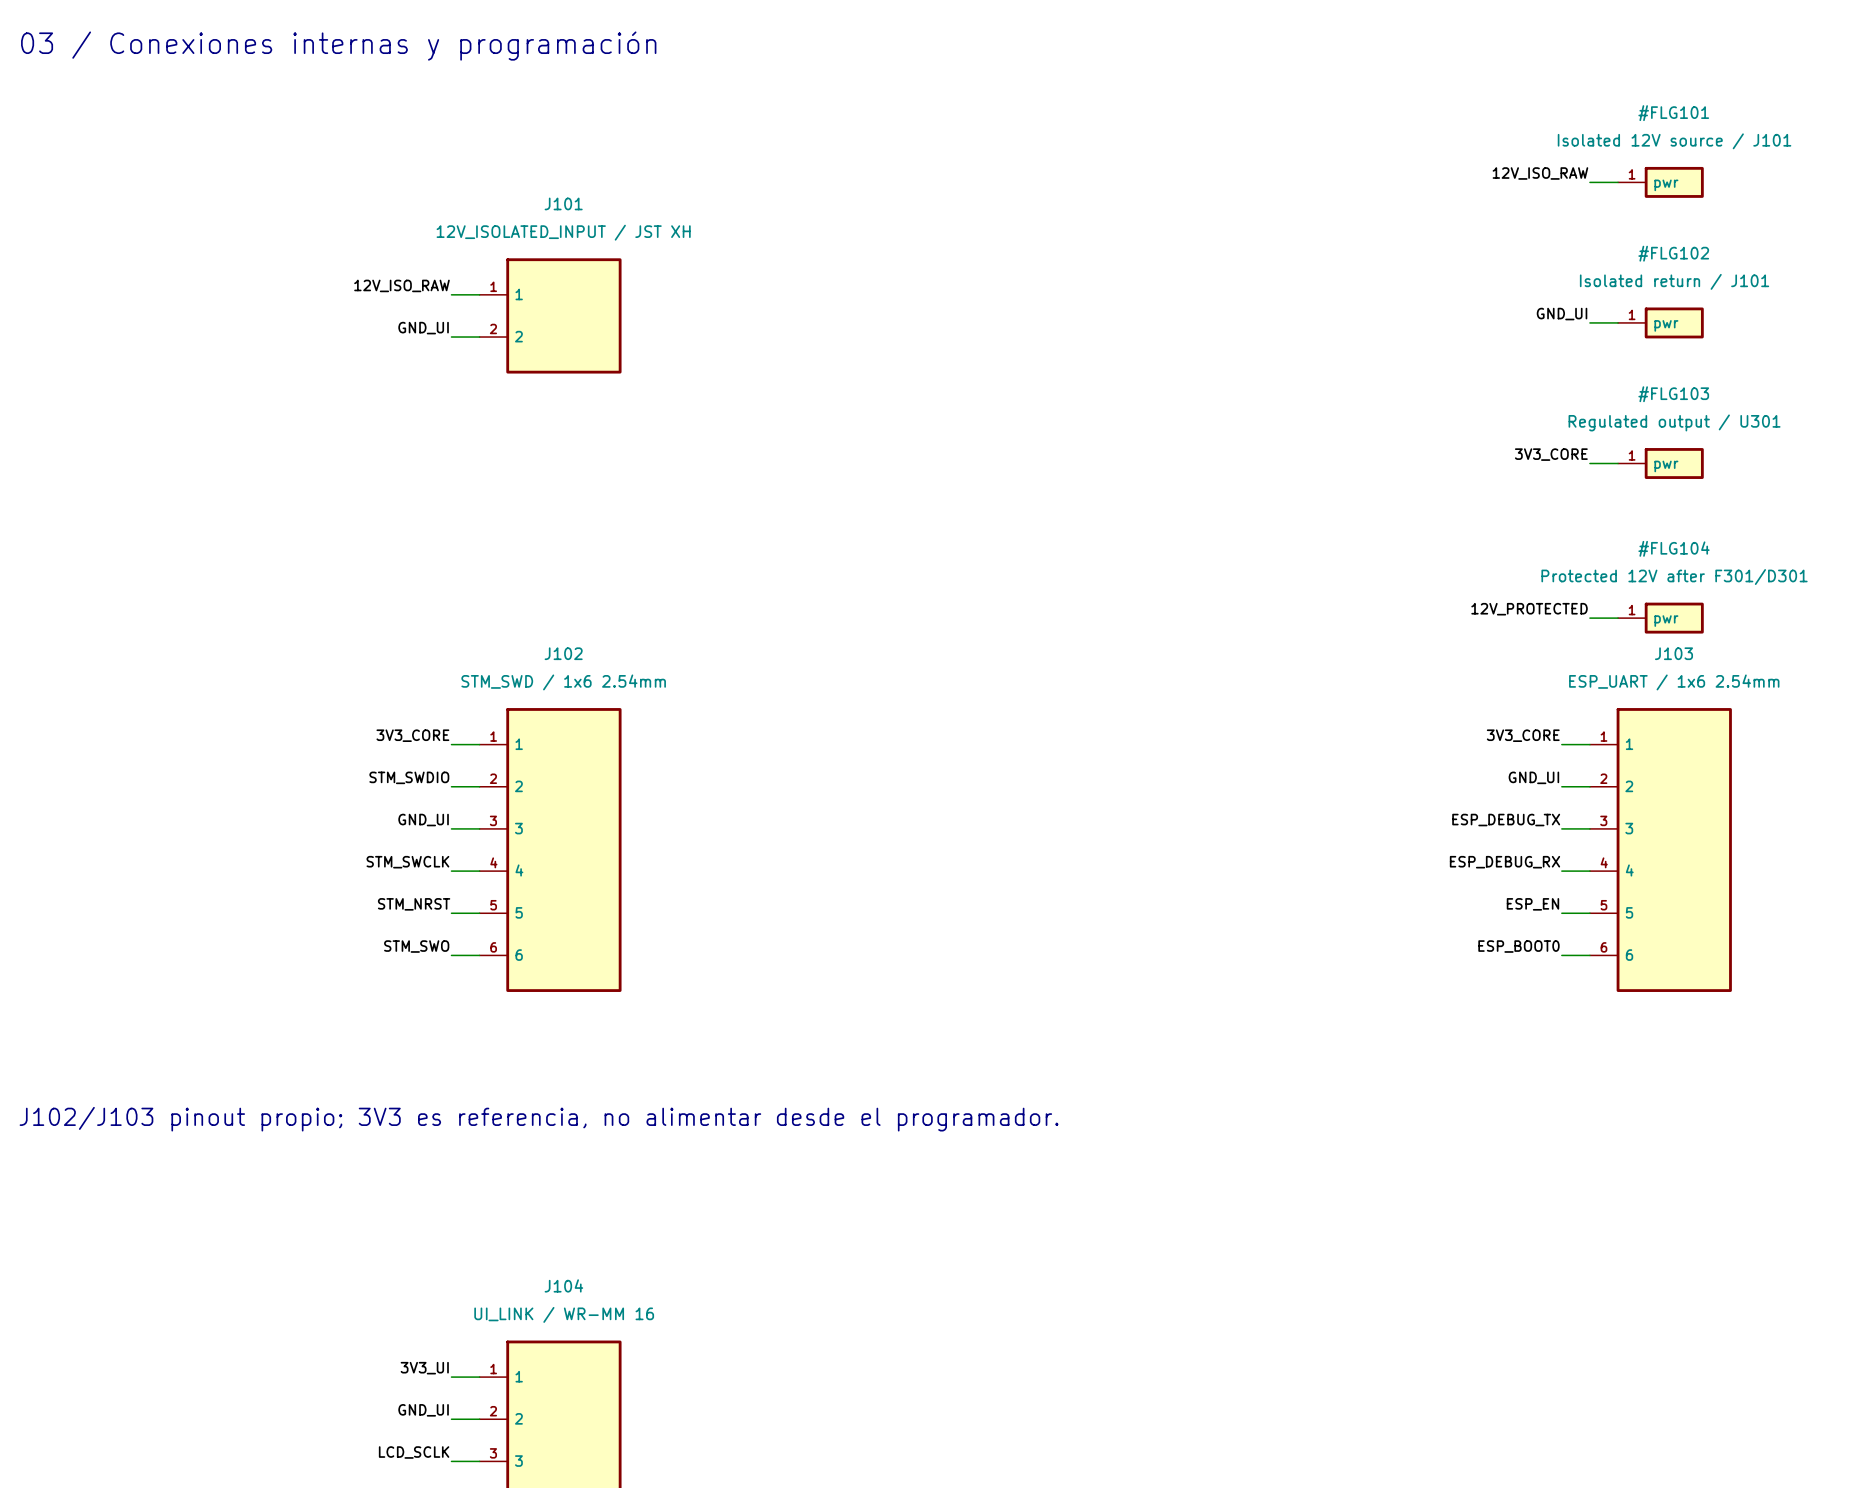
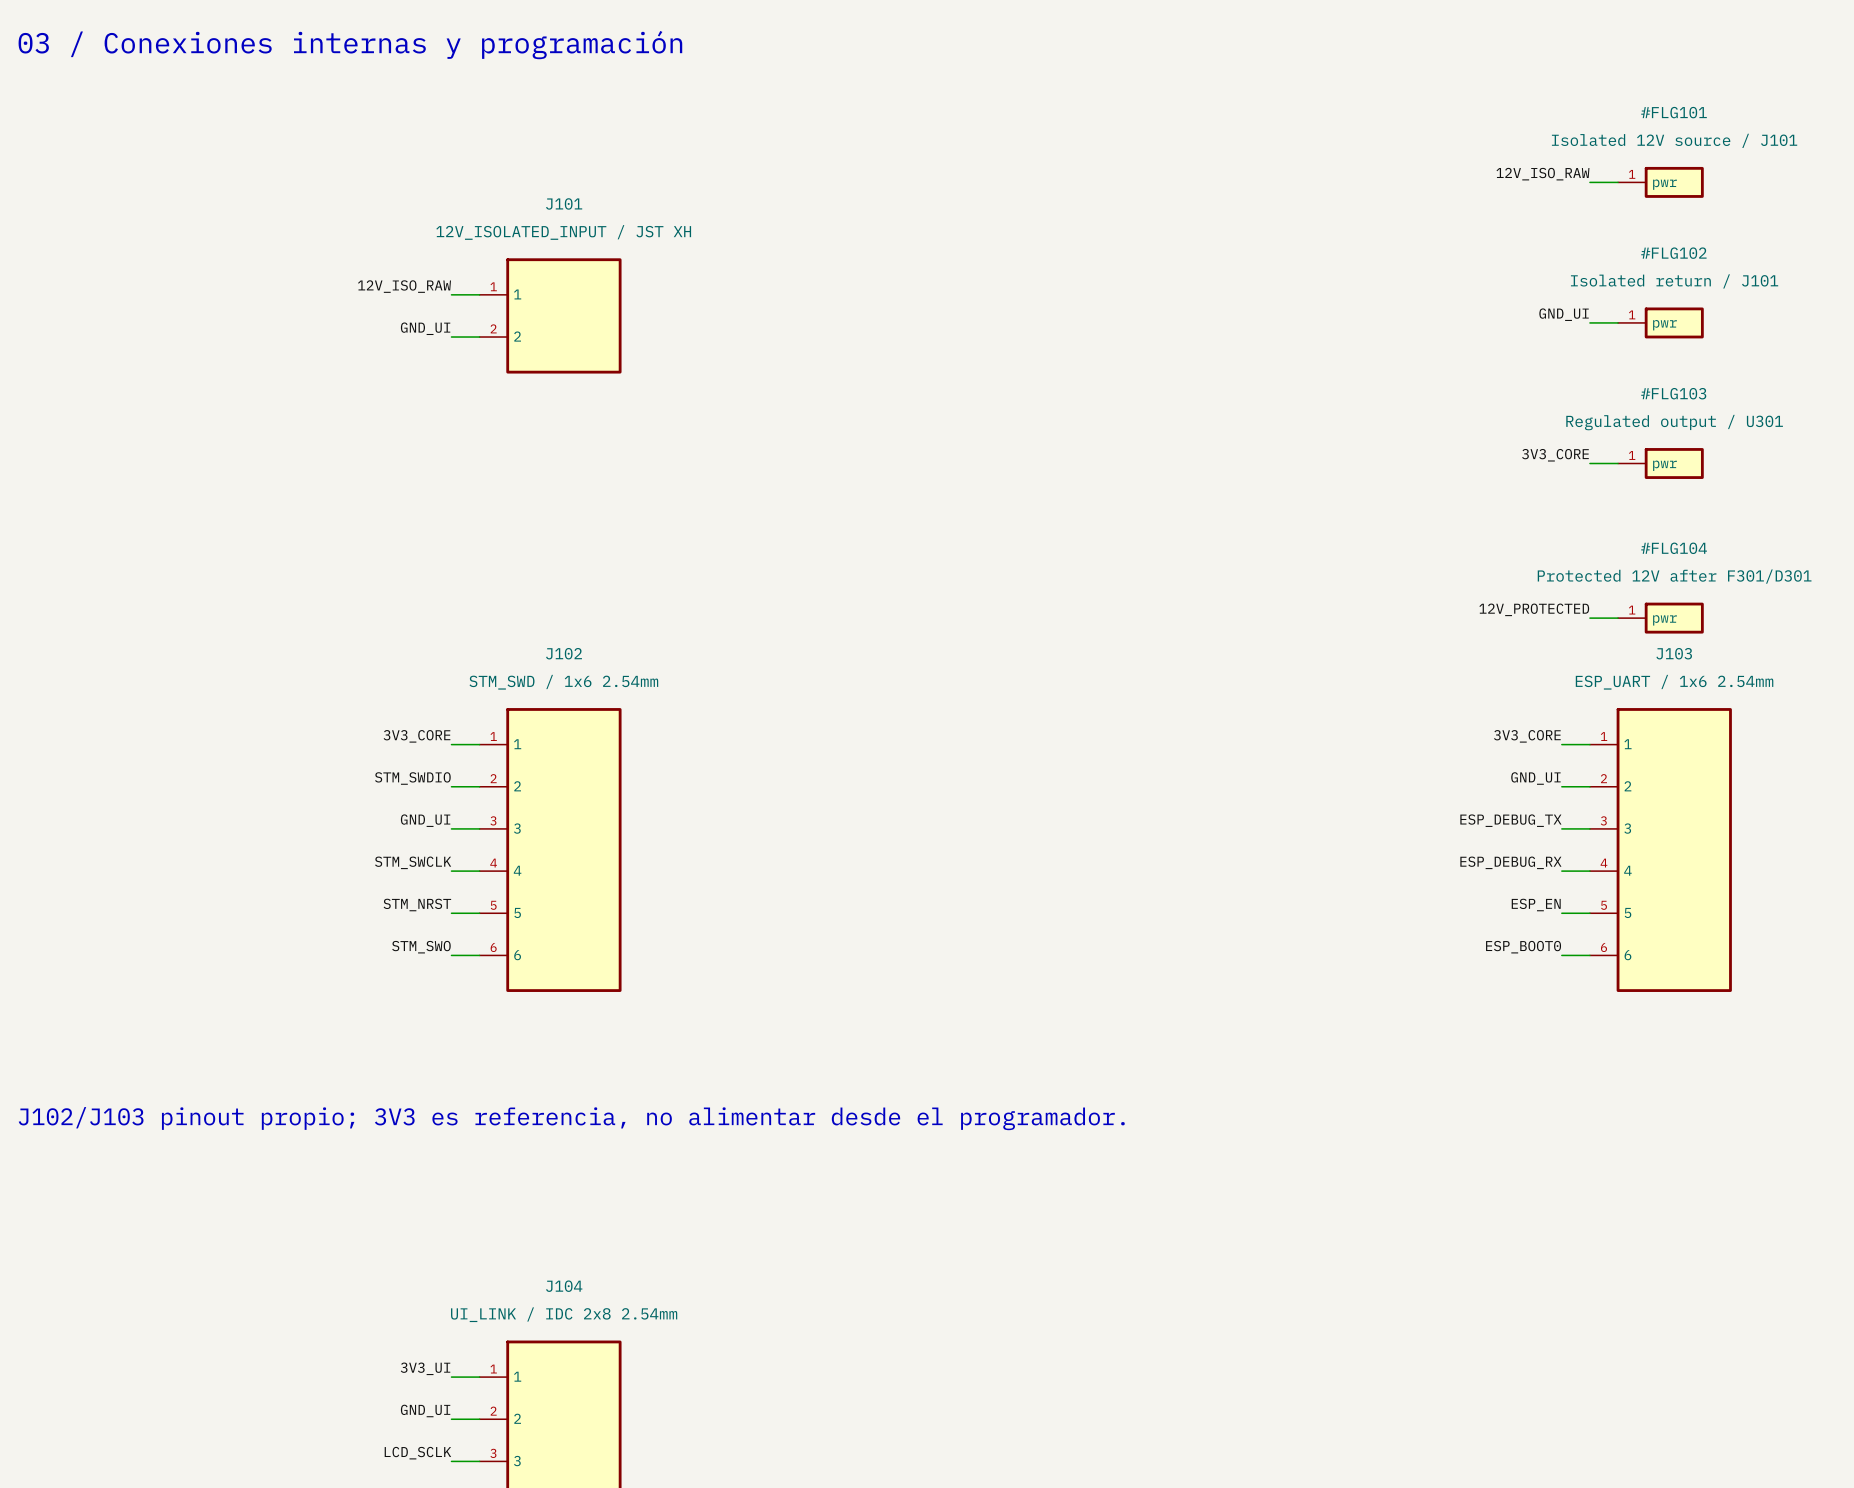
J104 value: UI_LINK / WR-MM 16 (564, 1314) -> UI_LINK / IDC 2x8 2.54mm (564, 1314)

